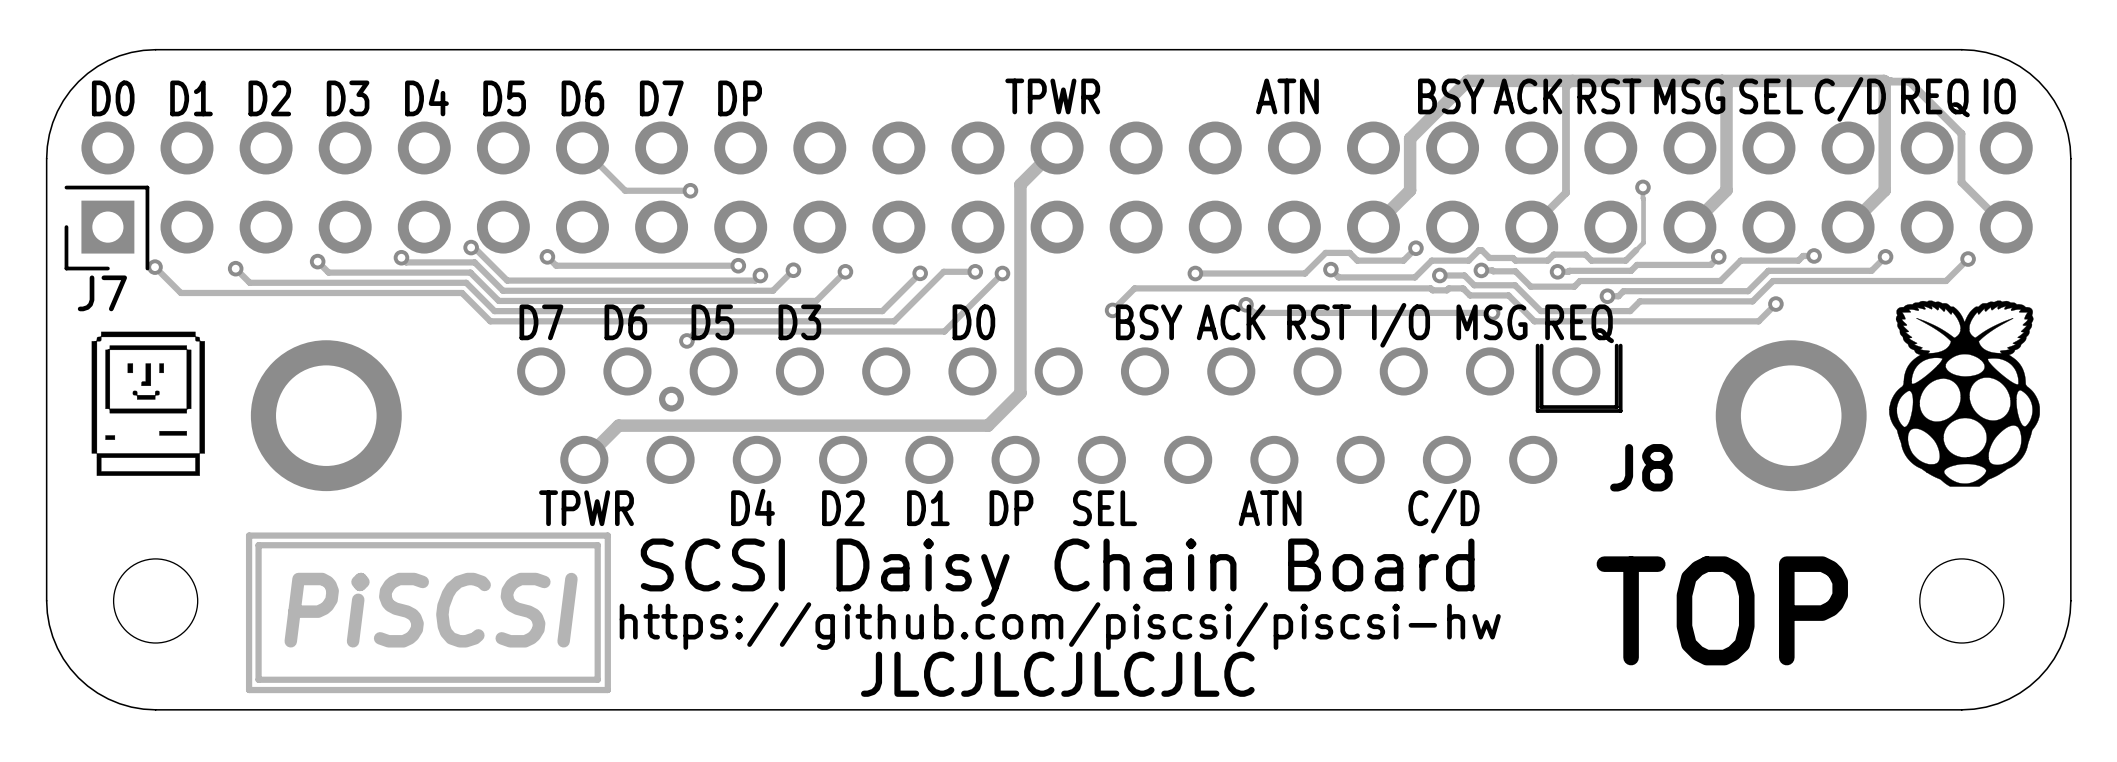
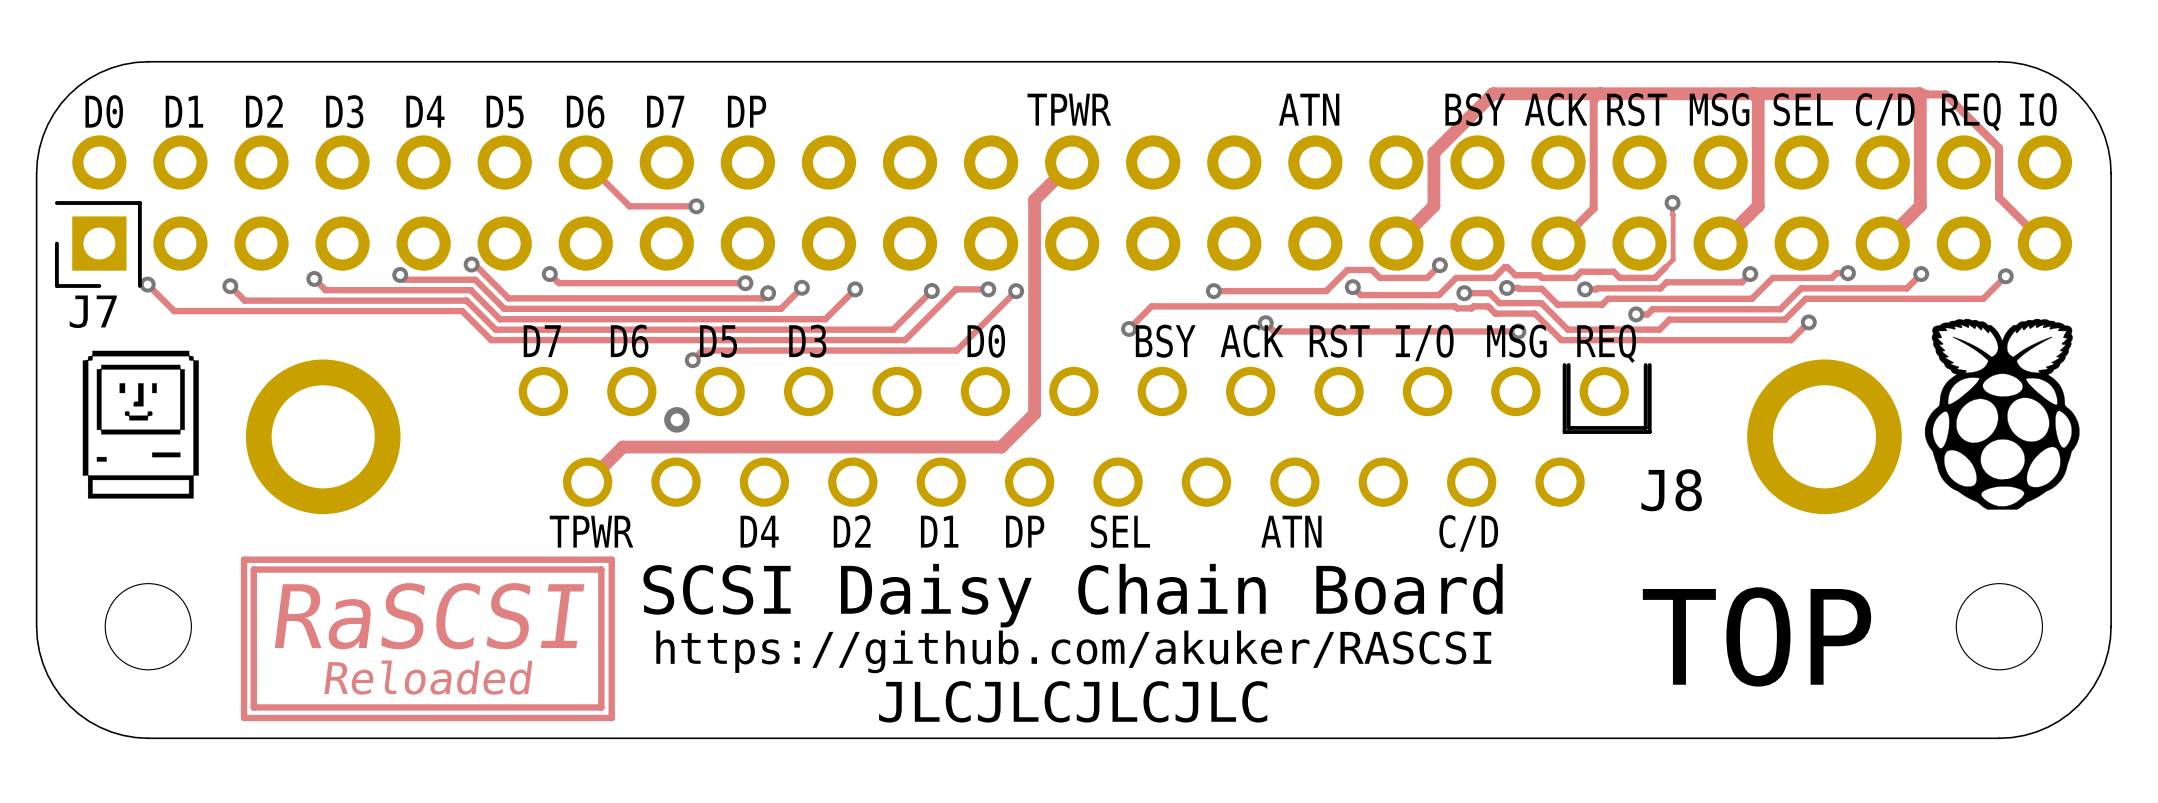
text: PiSCSI (431, 610) -> RaSCSI (429, 616)
text: https://github.com/piscsi/piscsi-hw (1060, 626) -> https://github.com/akuker/RASCSI (1073, 651)
text: none -> Reloaded (428, 677)

